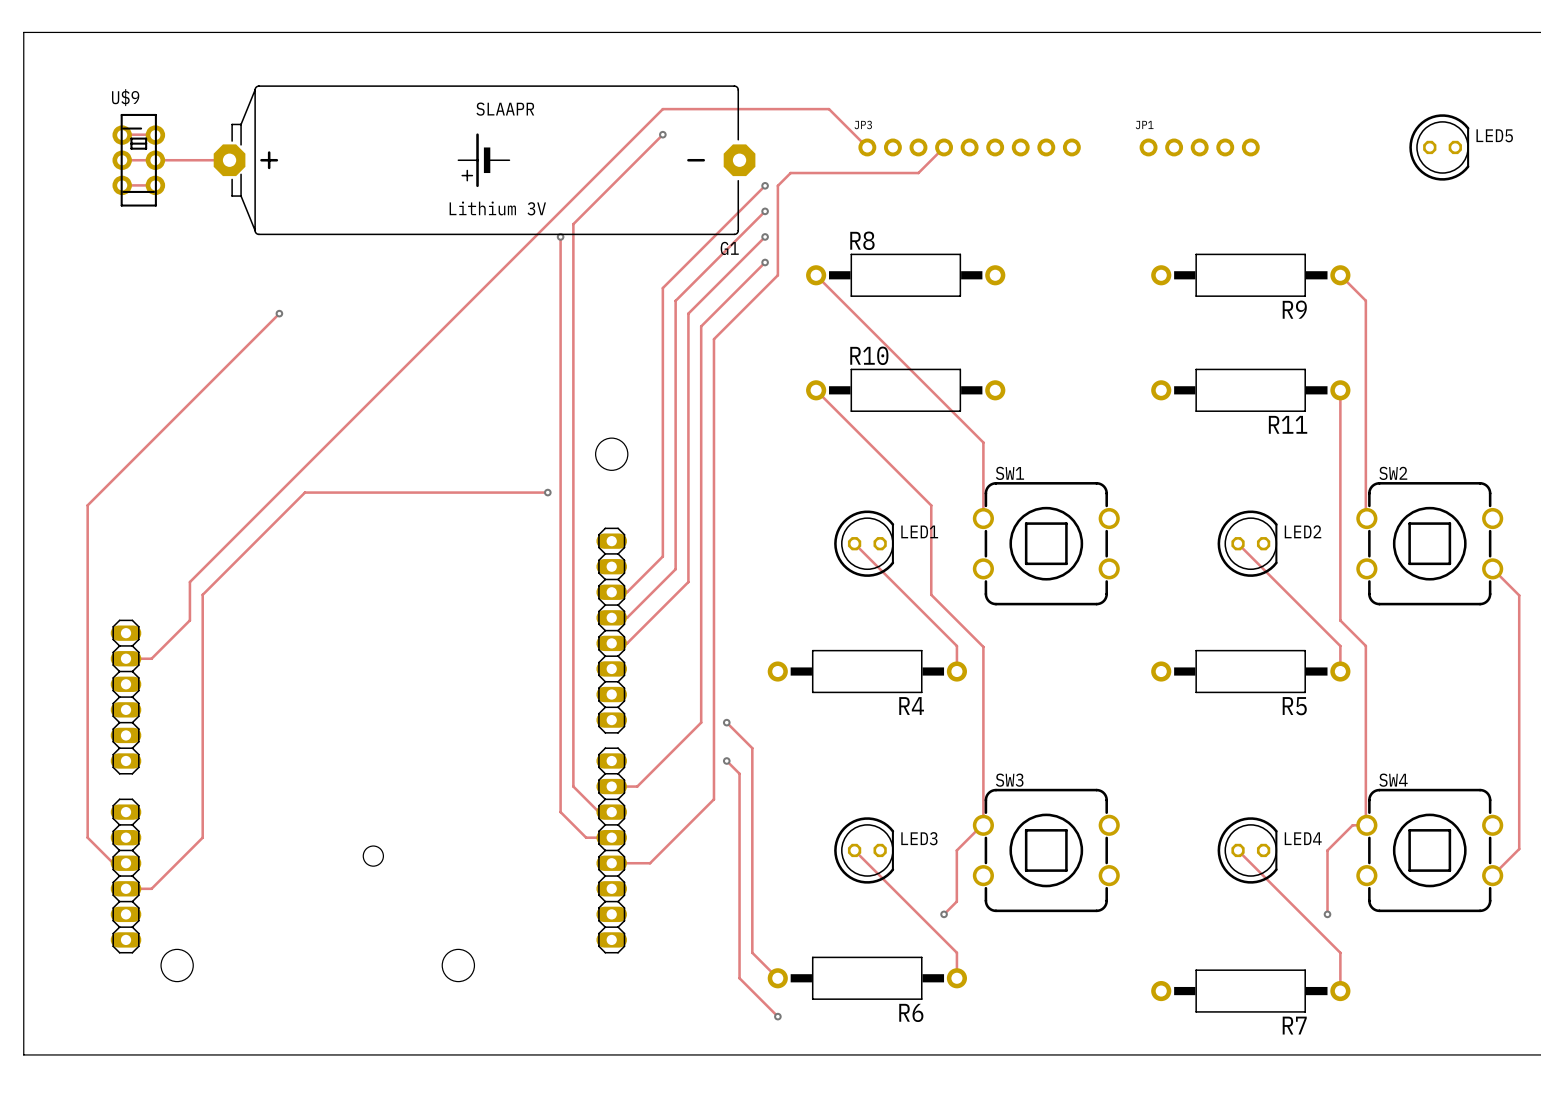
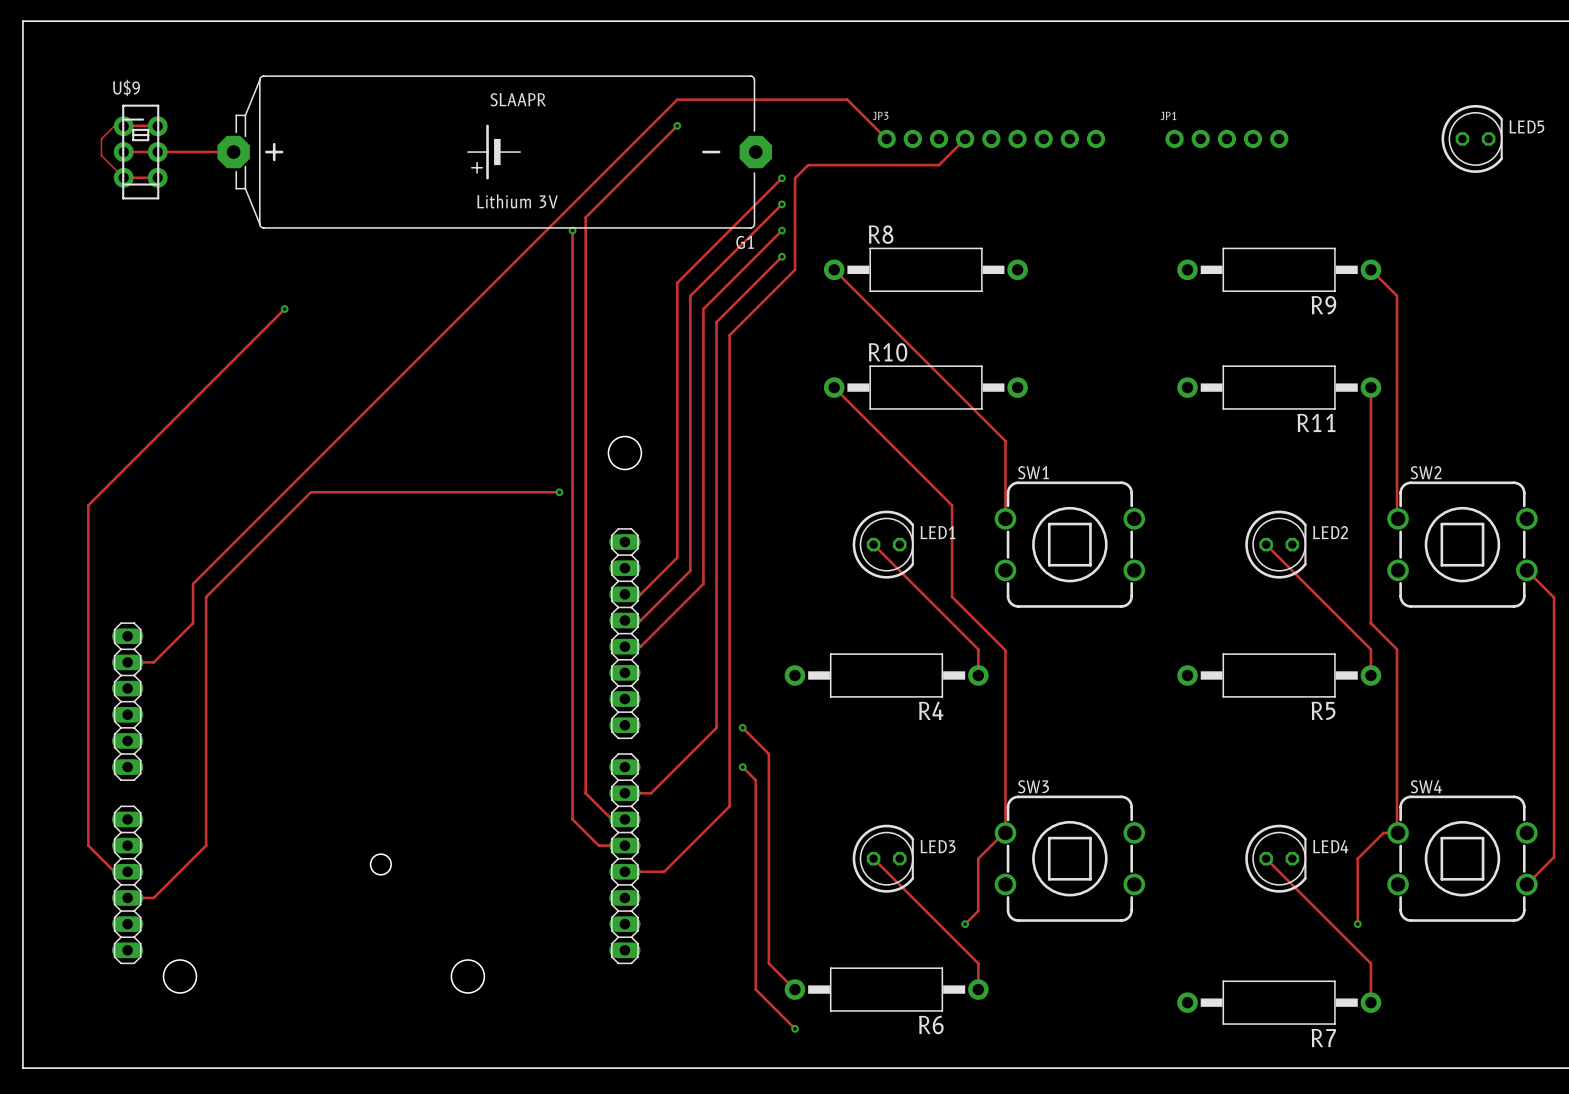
track: none -> (157, 126) (114, 126) (101, 138) (101, 155) (123, 177)

